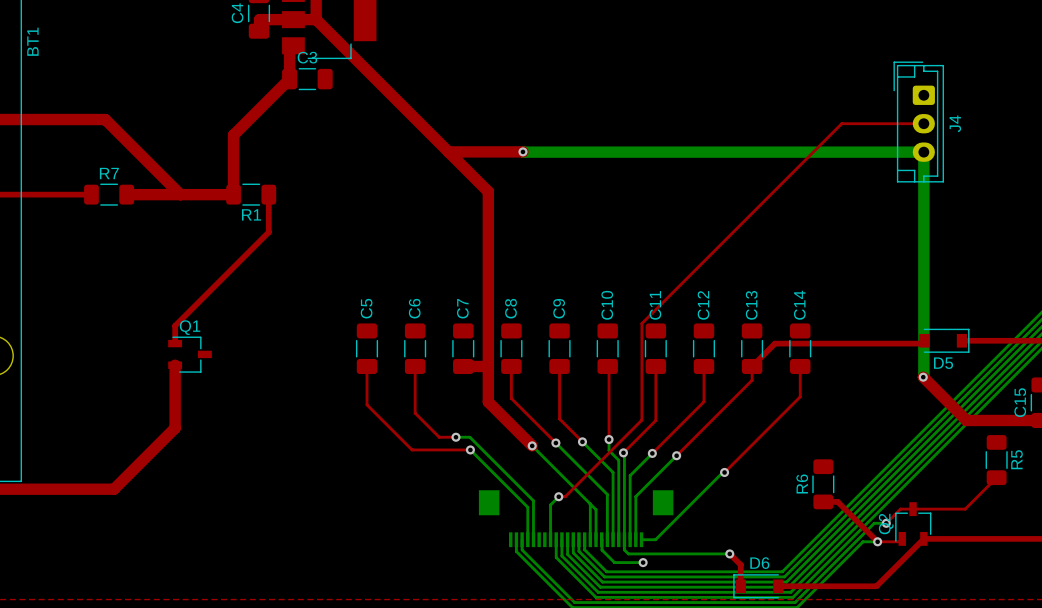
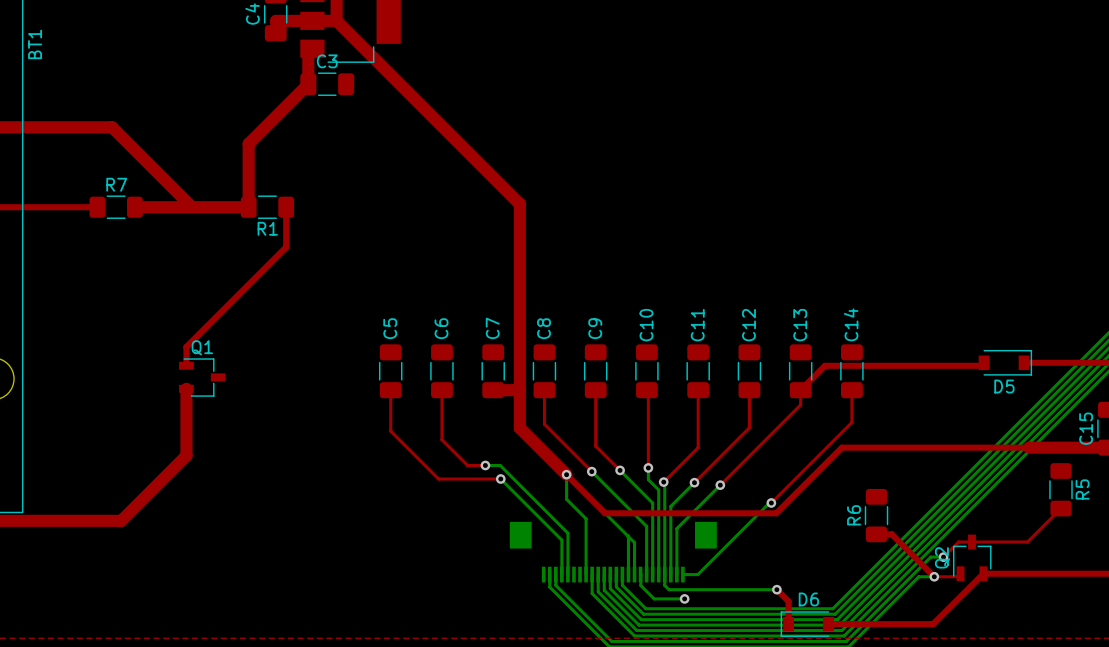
J4: (918, 122) -> none
top track: (923, 123) (841, 123) (641, 323) (641, 420) (565, 496) (558, 496) -> none
top track: (522, 151) (448, 152) -> none
bottom track: (522, 151) (923, 152) (923, 377) -> none
via: (522, 151) -> none
top track: (923, 377) (966, 420) -> (566, 474) (605, 513) (776, 513) (841, 447) (1029, 447)
via: (923, 377) -> none
bottom track: (558, 496) (550, 504) -> (566, 474) (566, 499) (586, 518) (586, 537)
via: (558, 496) -> none

